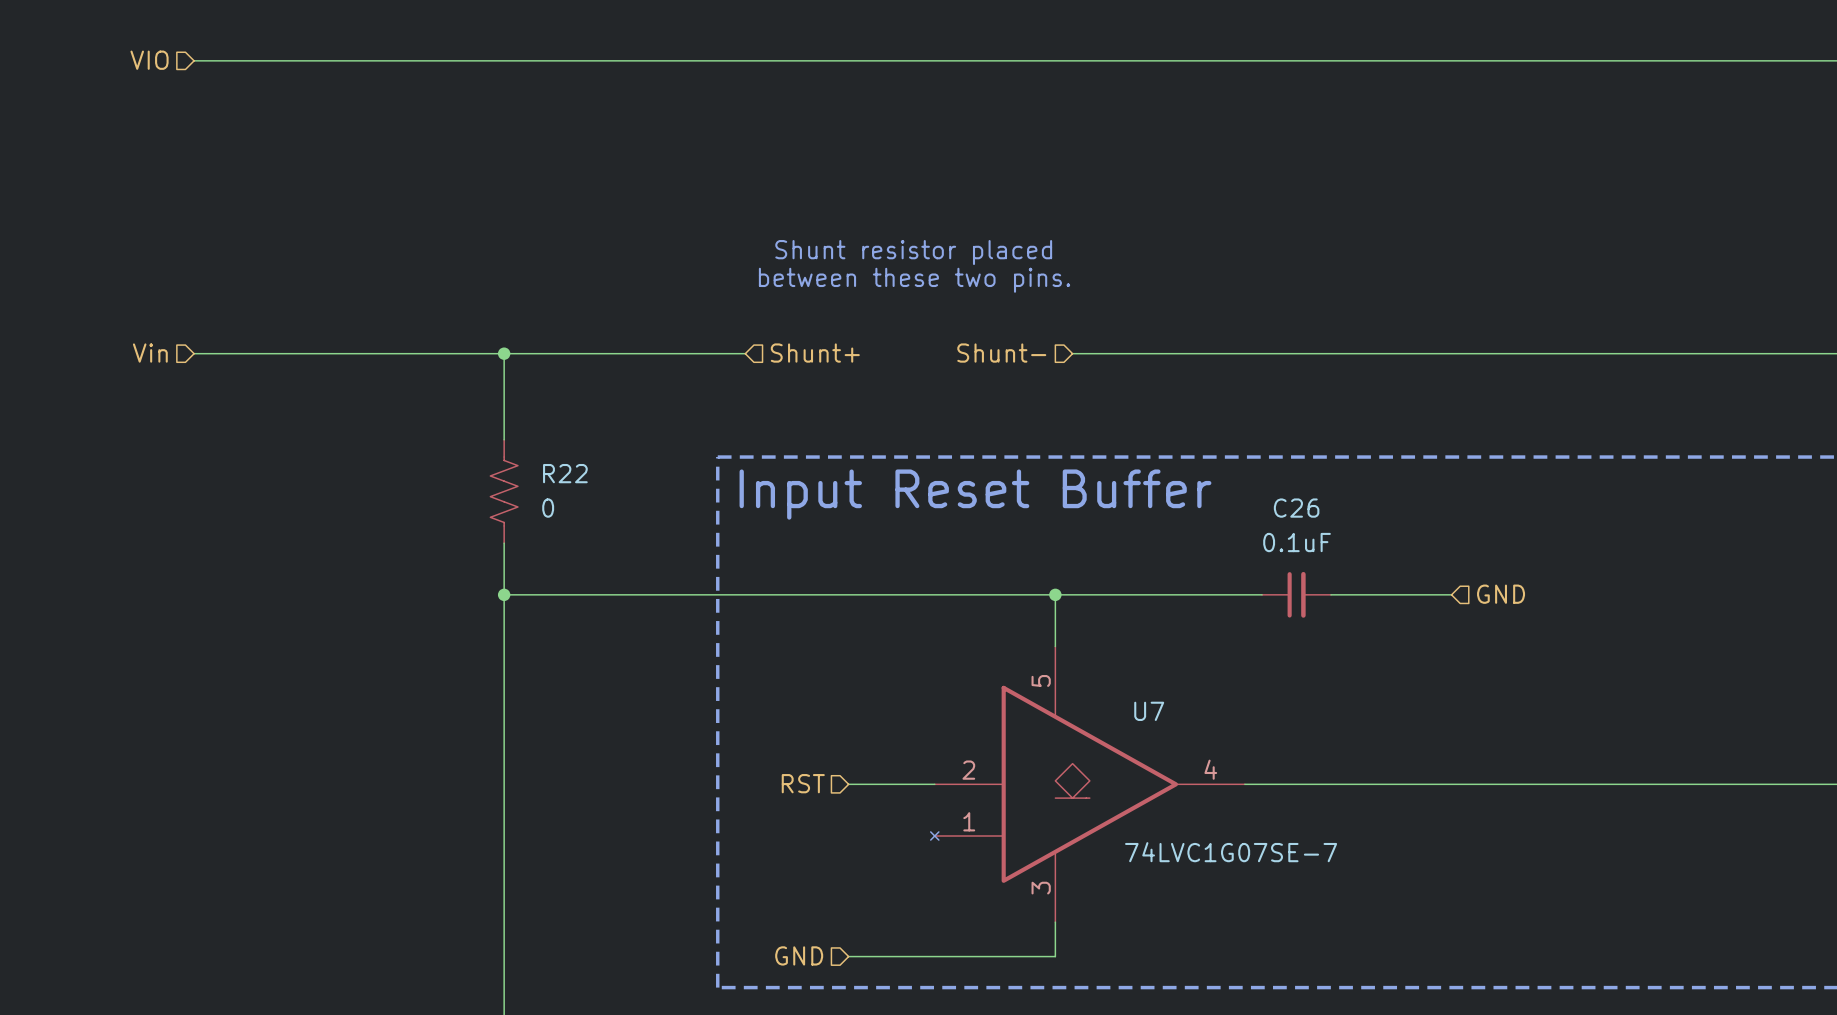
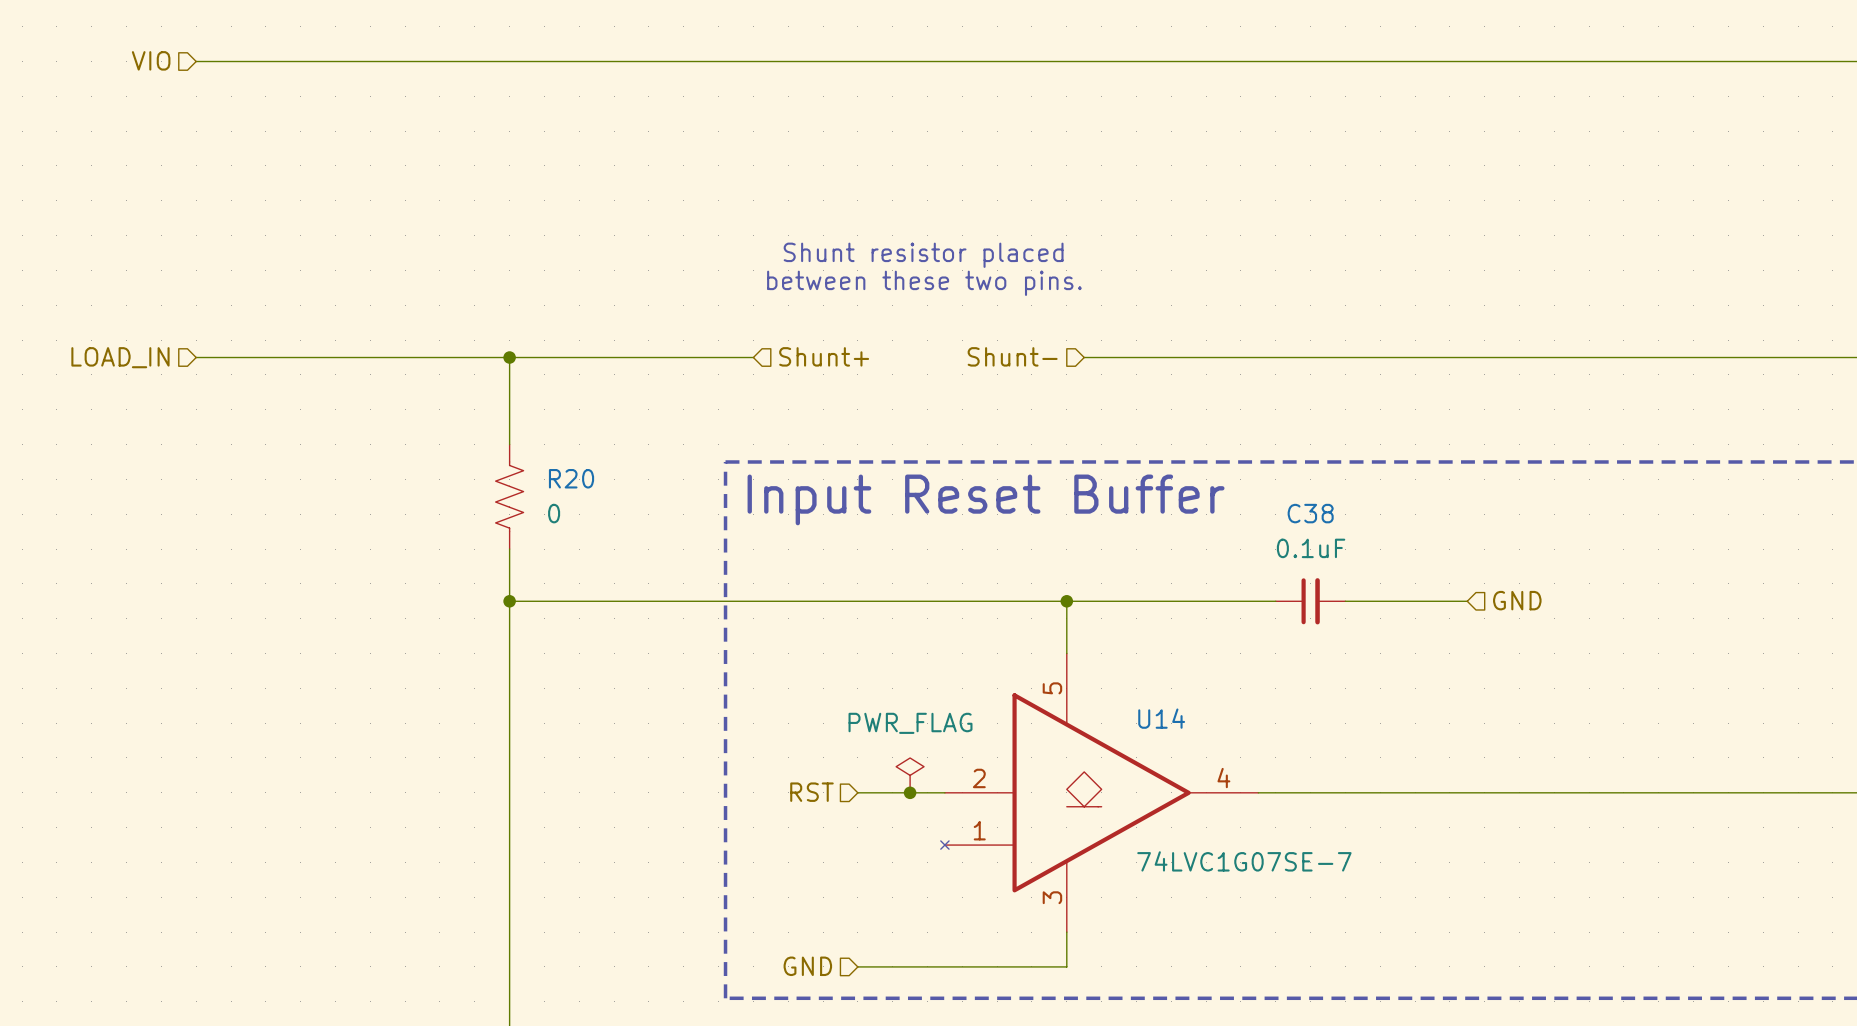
hierarchical label: Vin (150, 353) -> LOAD_IN (120, 357)
R22 name: R22 (565, 473) -> R20 (571, 478)
C26 name: C26 (1296, 508) -> C38 (1310, 513)
U7 name: U7 (1149, 711) -> U14 (1161, 718)
power symbol: none -> PWR_FLAG (910, 775)
junction: none -> (910, 792)

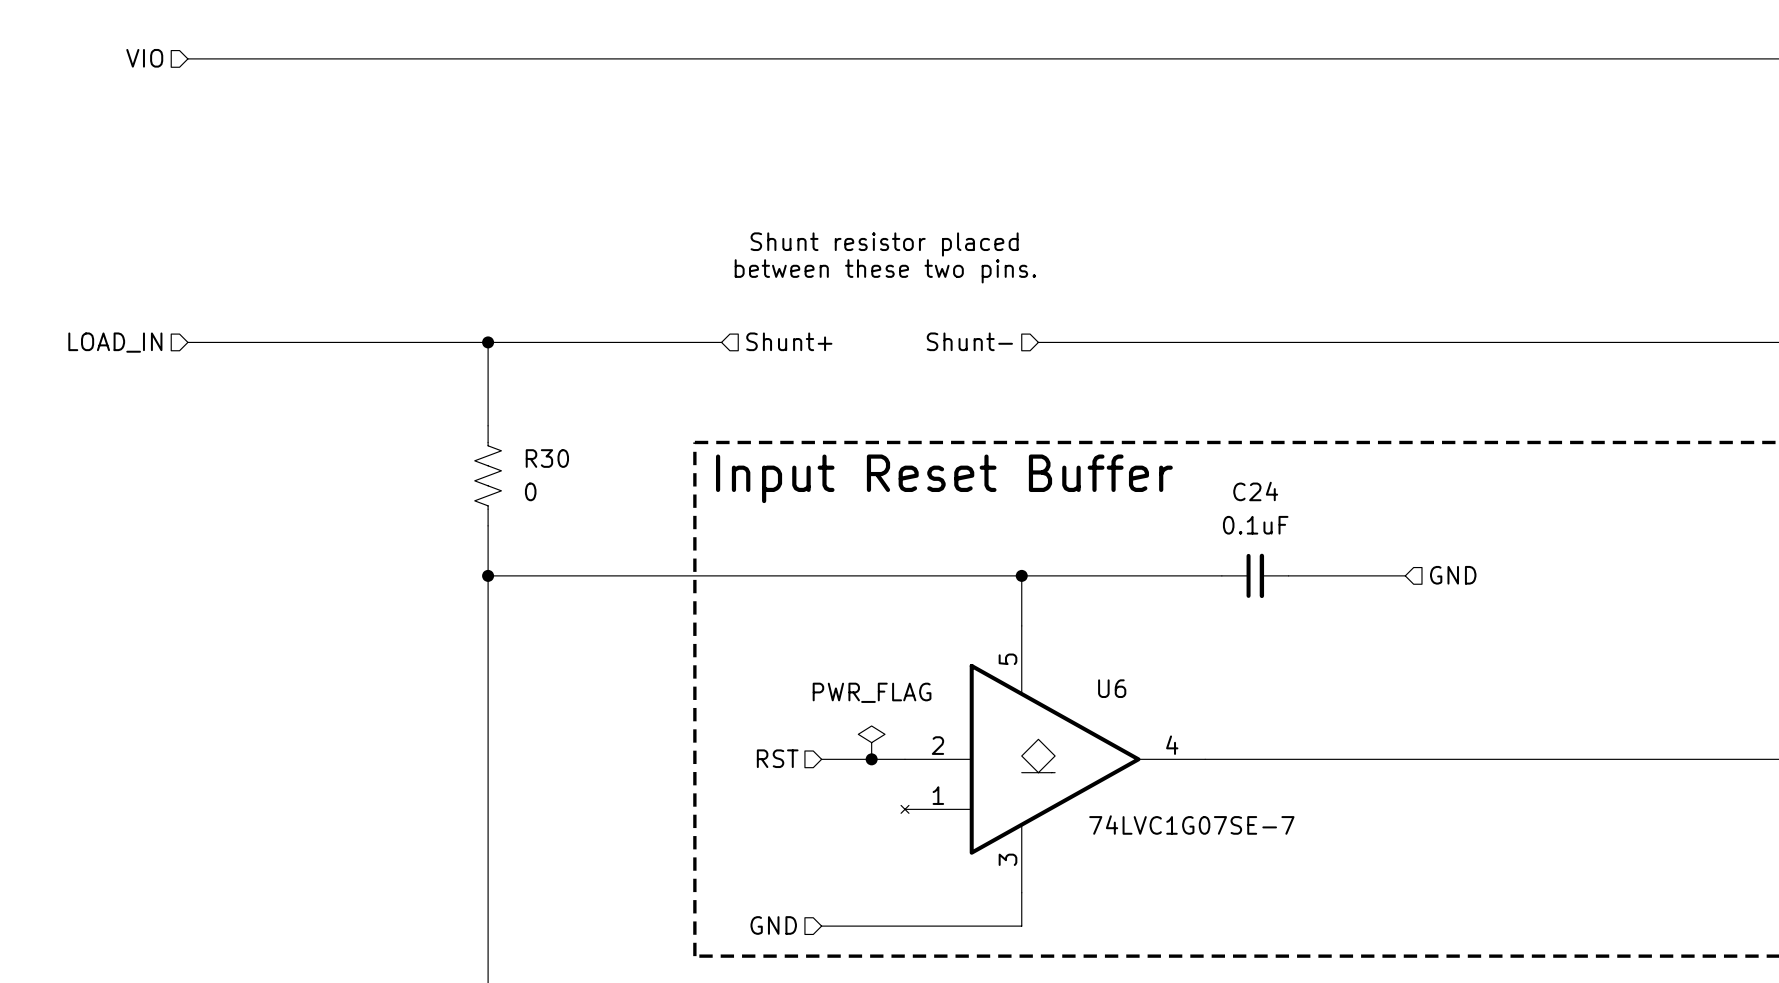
R20 name: R20 (571, 478) -> R30 (547, 458)
C38 name: C38 (1310, 513) -> C24 (1255, 491)
U14 name: U14 (1161, 718) -> U6 (1112, 688)

